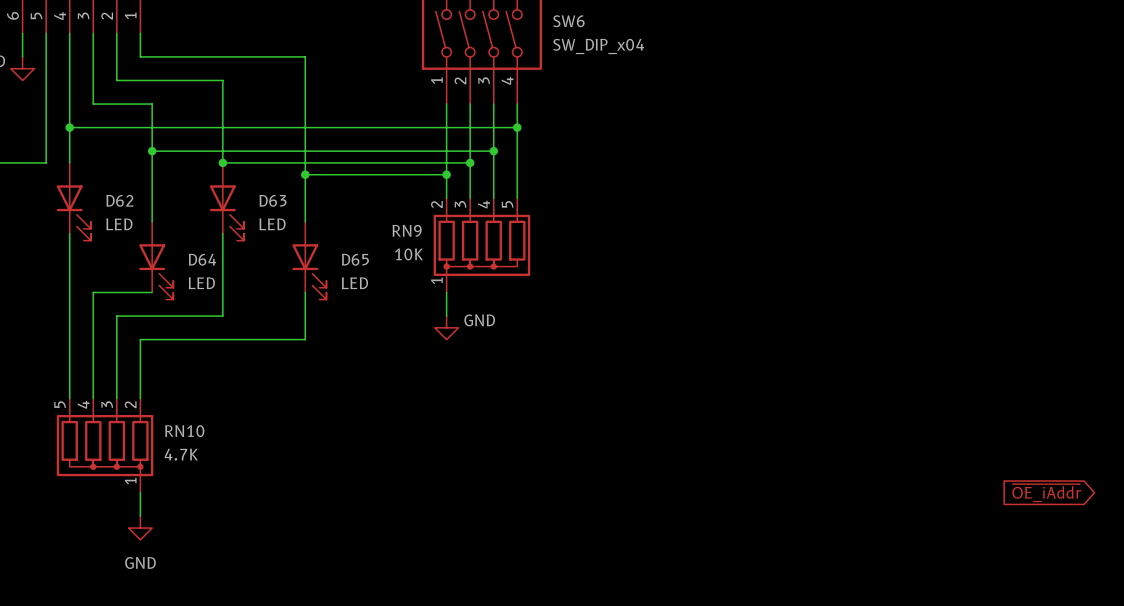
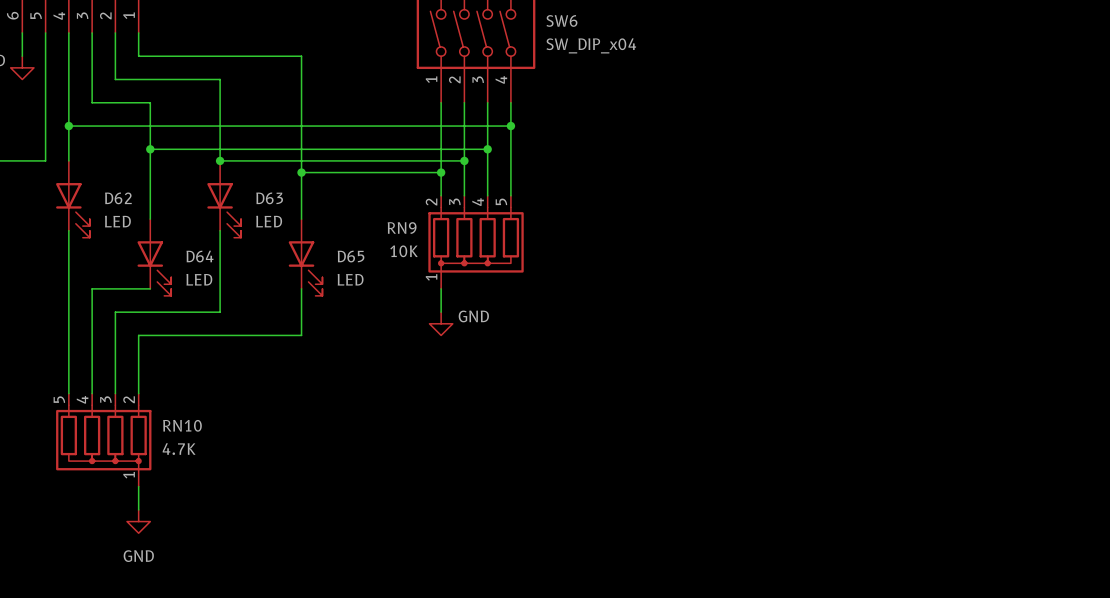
global label: ~{OE_iAddr} (1046, 493) -> none

